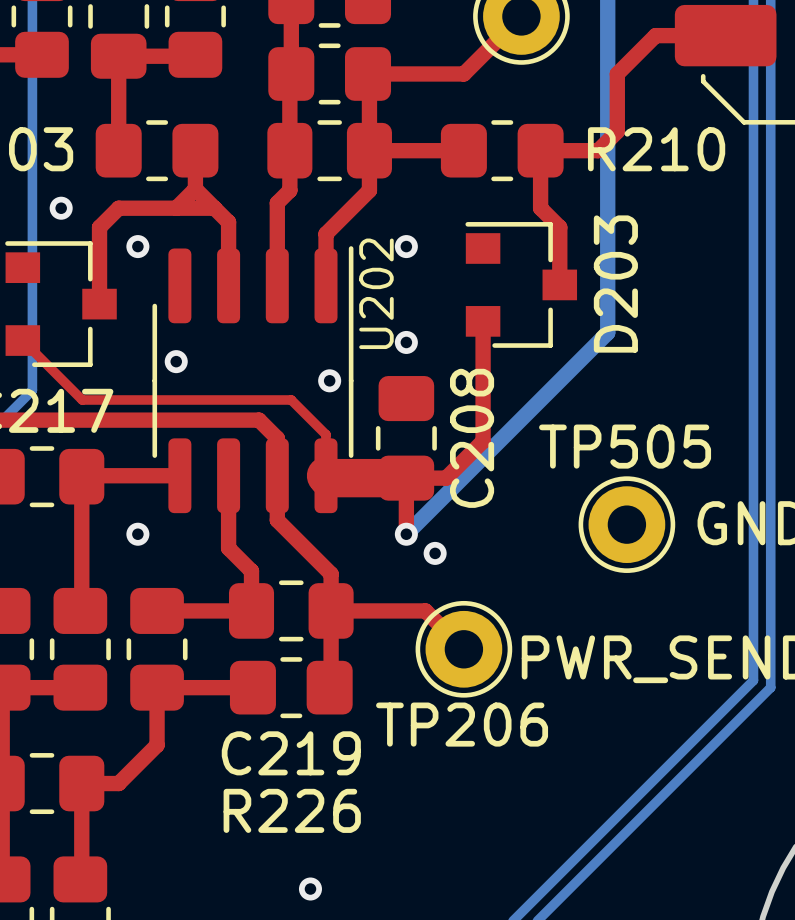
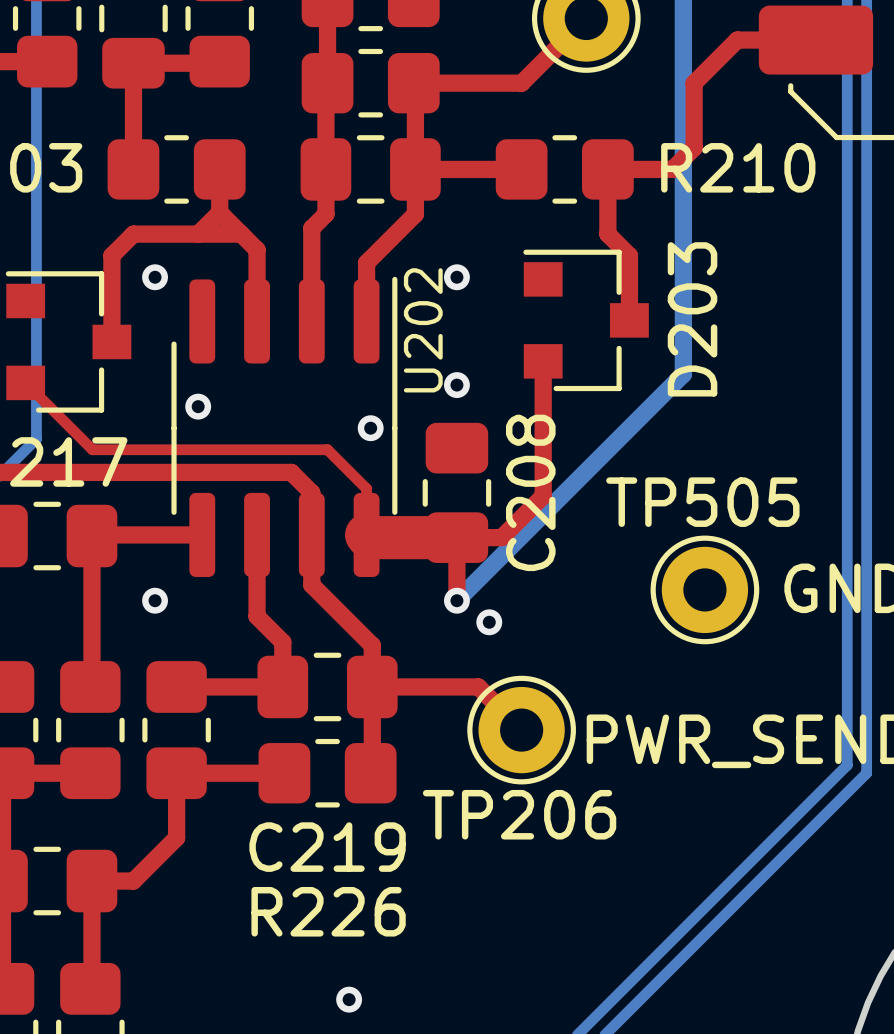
via: (61, 208) -> none

